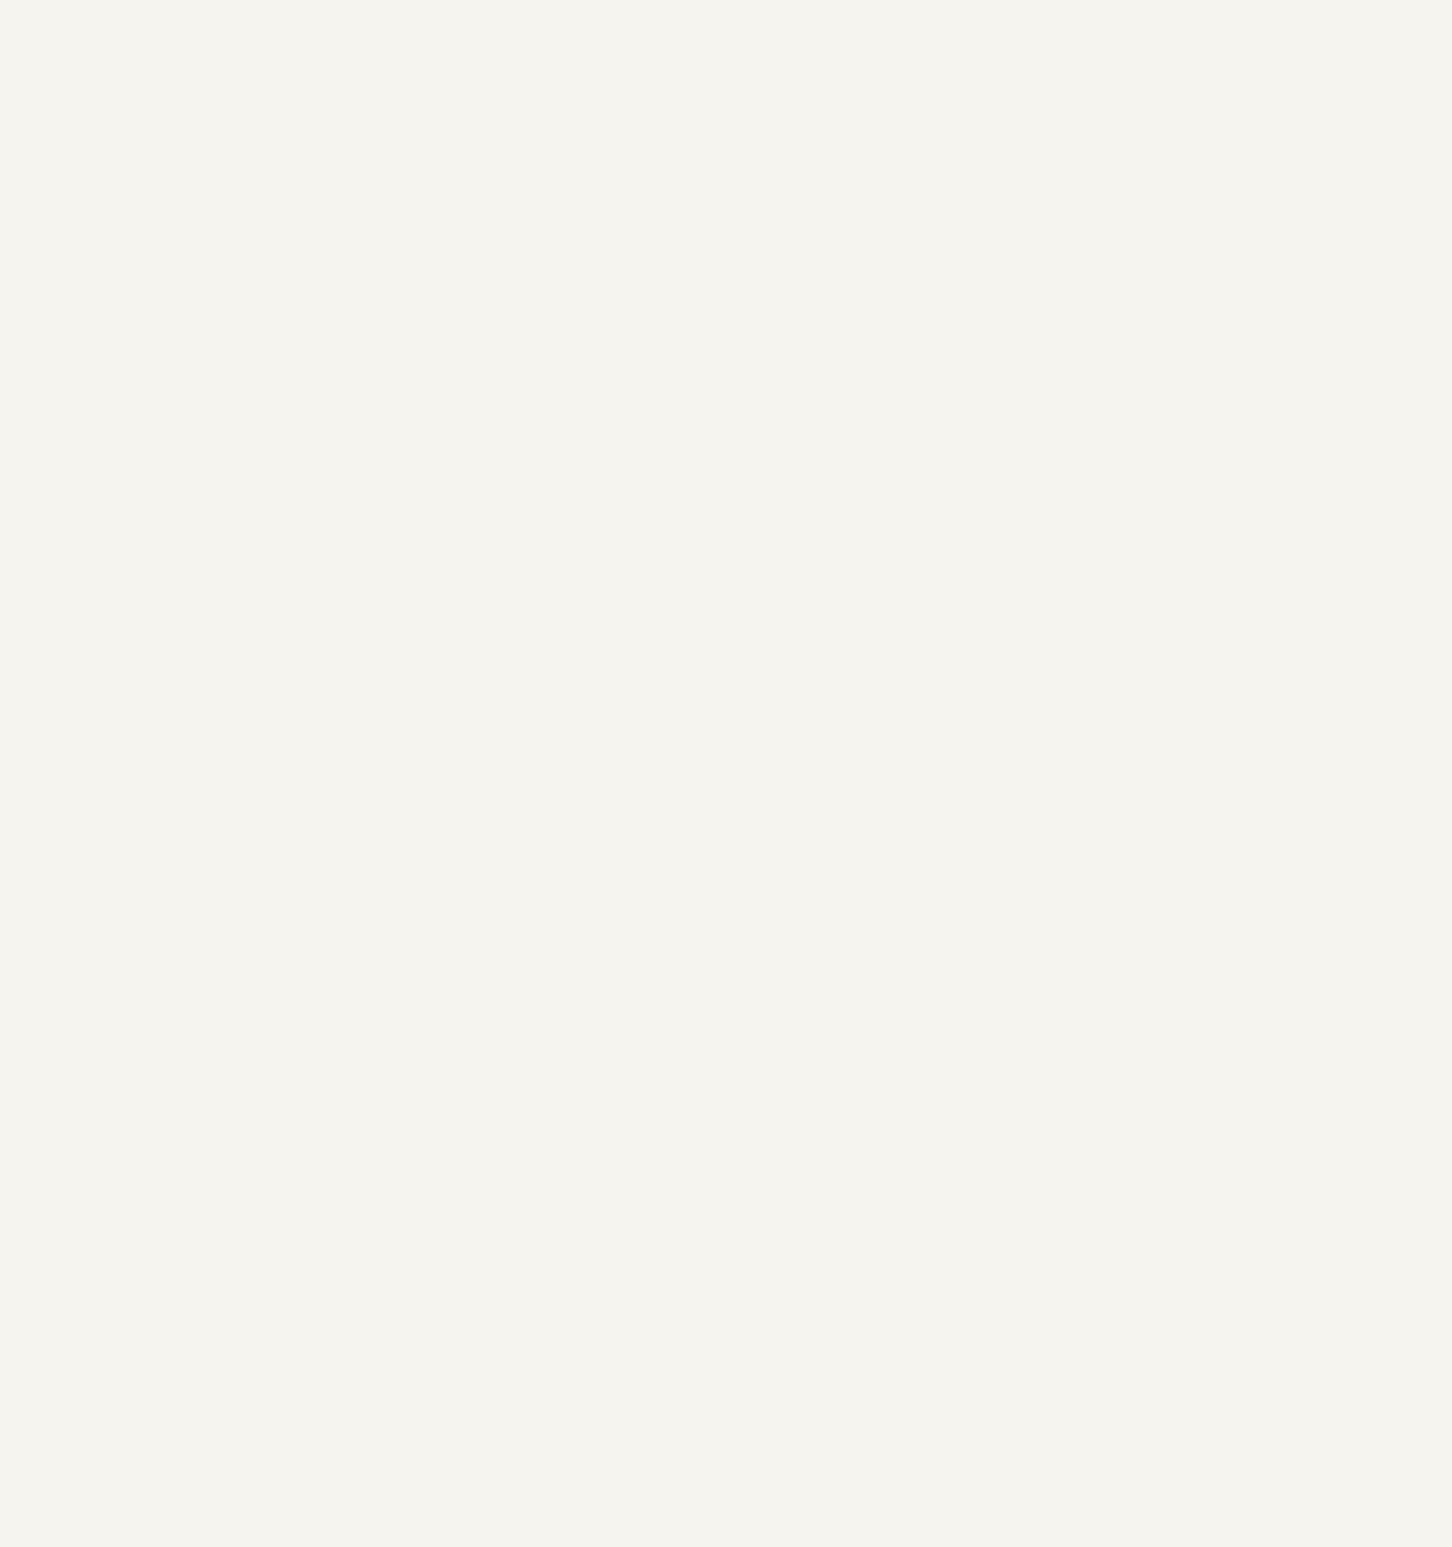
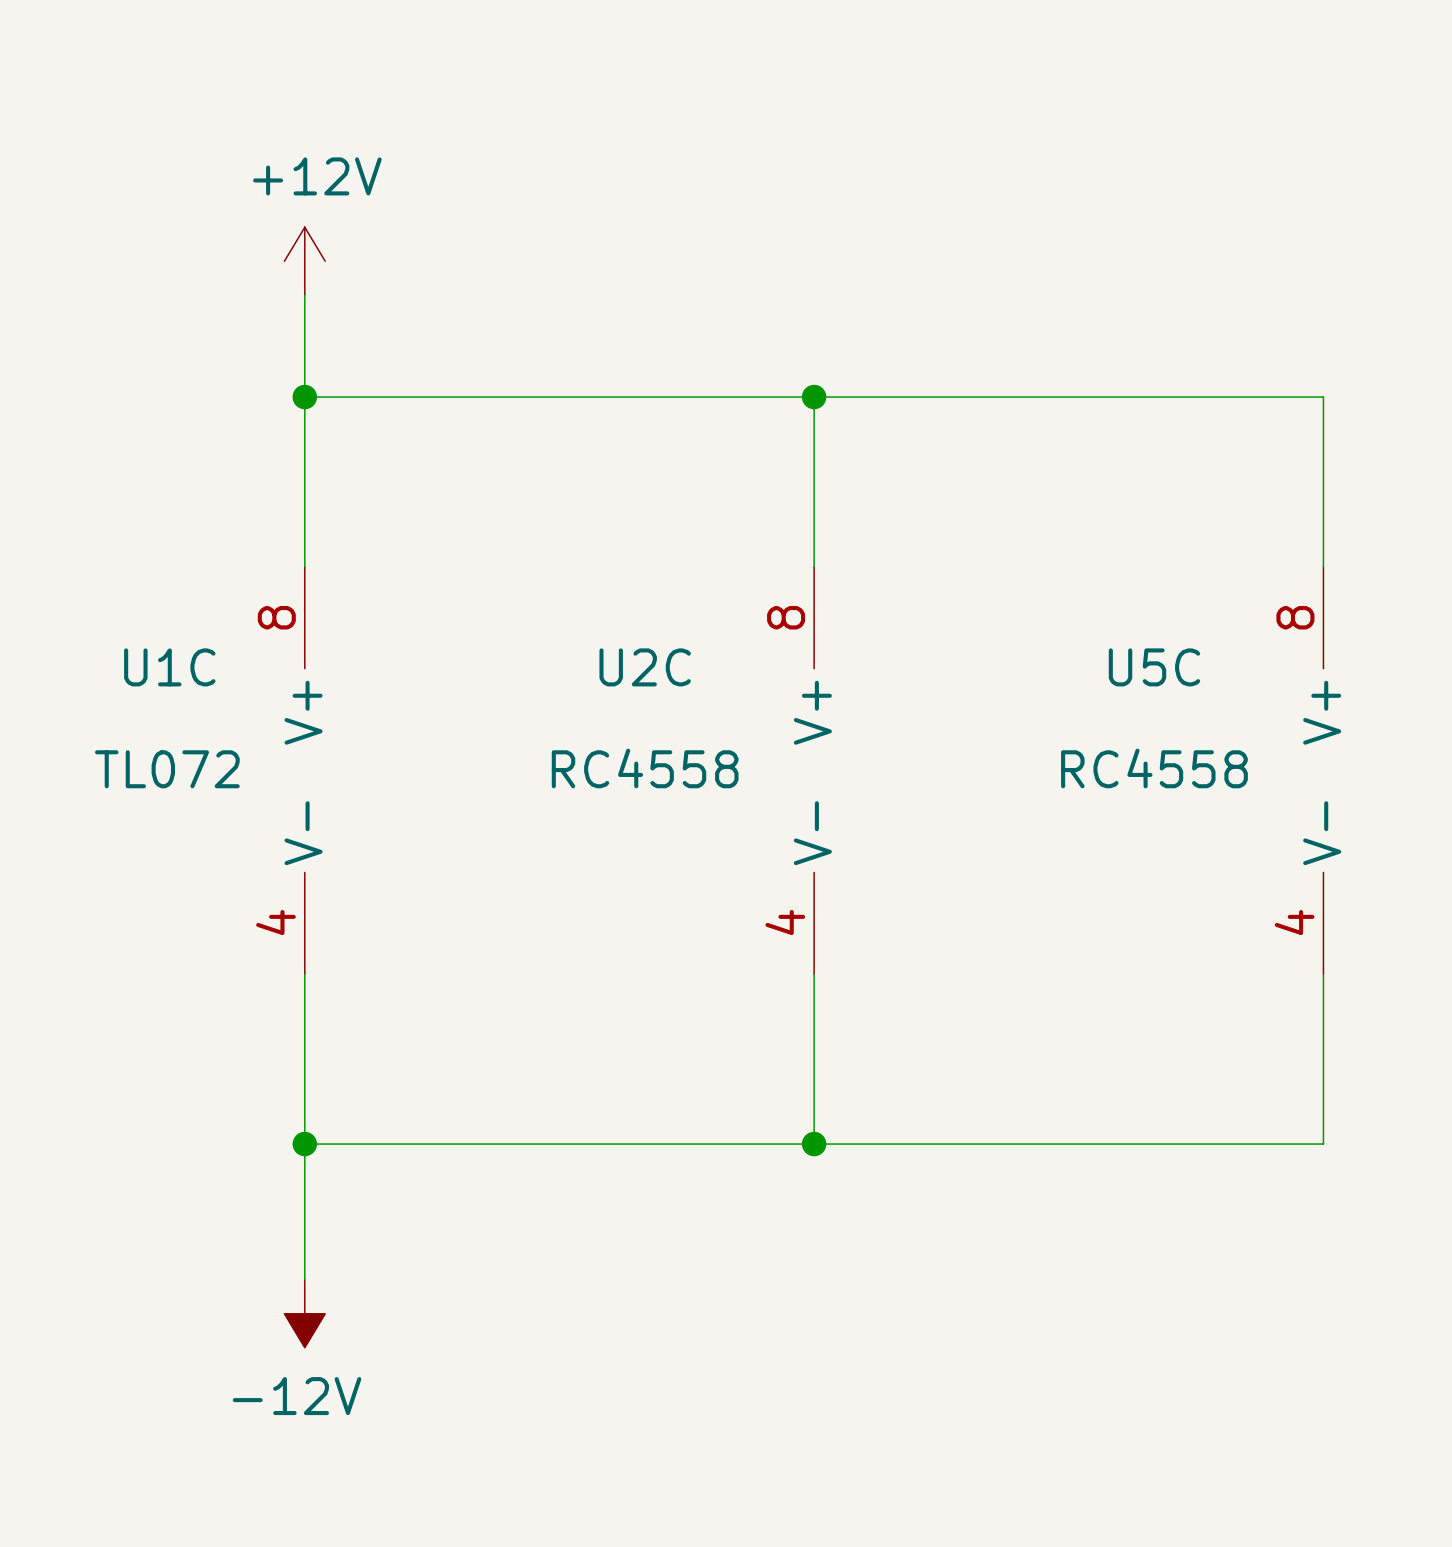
power symbol: none -> +12V (304, 261)
wire: none -> (304, 295) (304, 566)
wire: none -> (304, 397) (1323, 397) (1323, 566)
junction: none -> (304, 397)
wire: none -> (814, 397) (814, 566)
junction: none -> (814, 397)
U1C: none -> TL072 (304, 770)
U2C: none -> RC4558 (814, 770)
U5C: none -> RC4558 (1323, 770)
wire: none -> (304, 974) (304, 1279)
wire: none -> (814, 974) (814, 1144)
wire: none -> (1323, 974) (1323, 1144) (304, 1144)
junction: none -> (304, 1144)
junction: none -> (814, 1144)
power symbol: none -> -12V (304, 1313)

